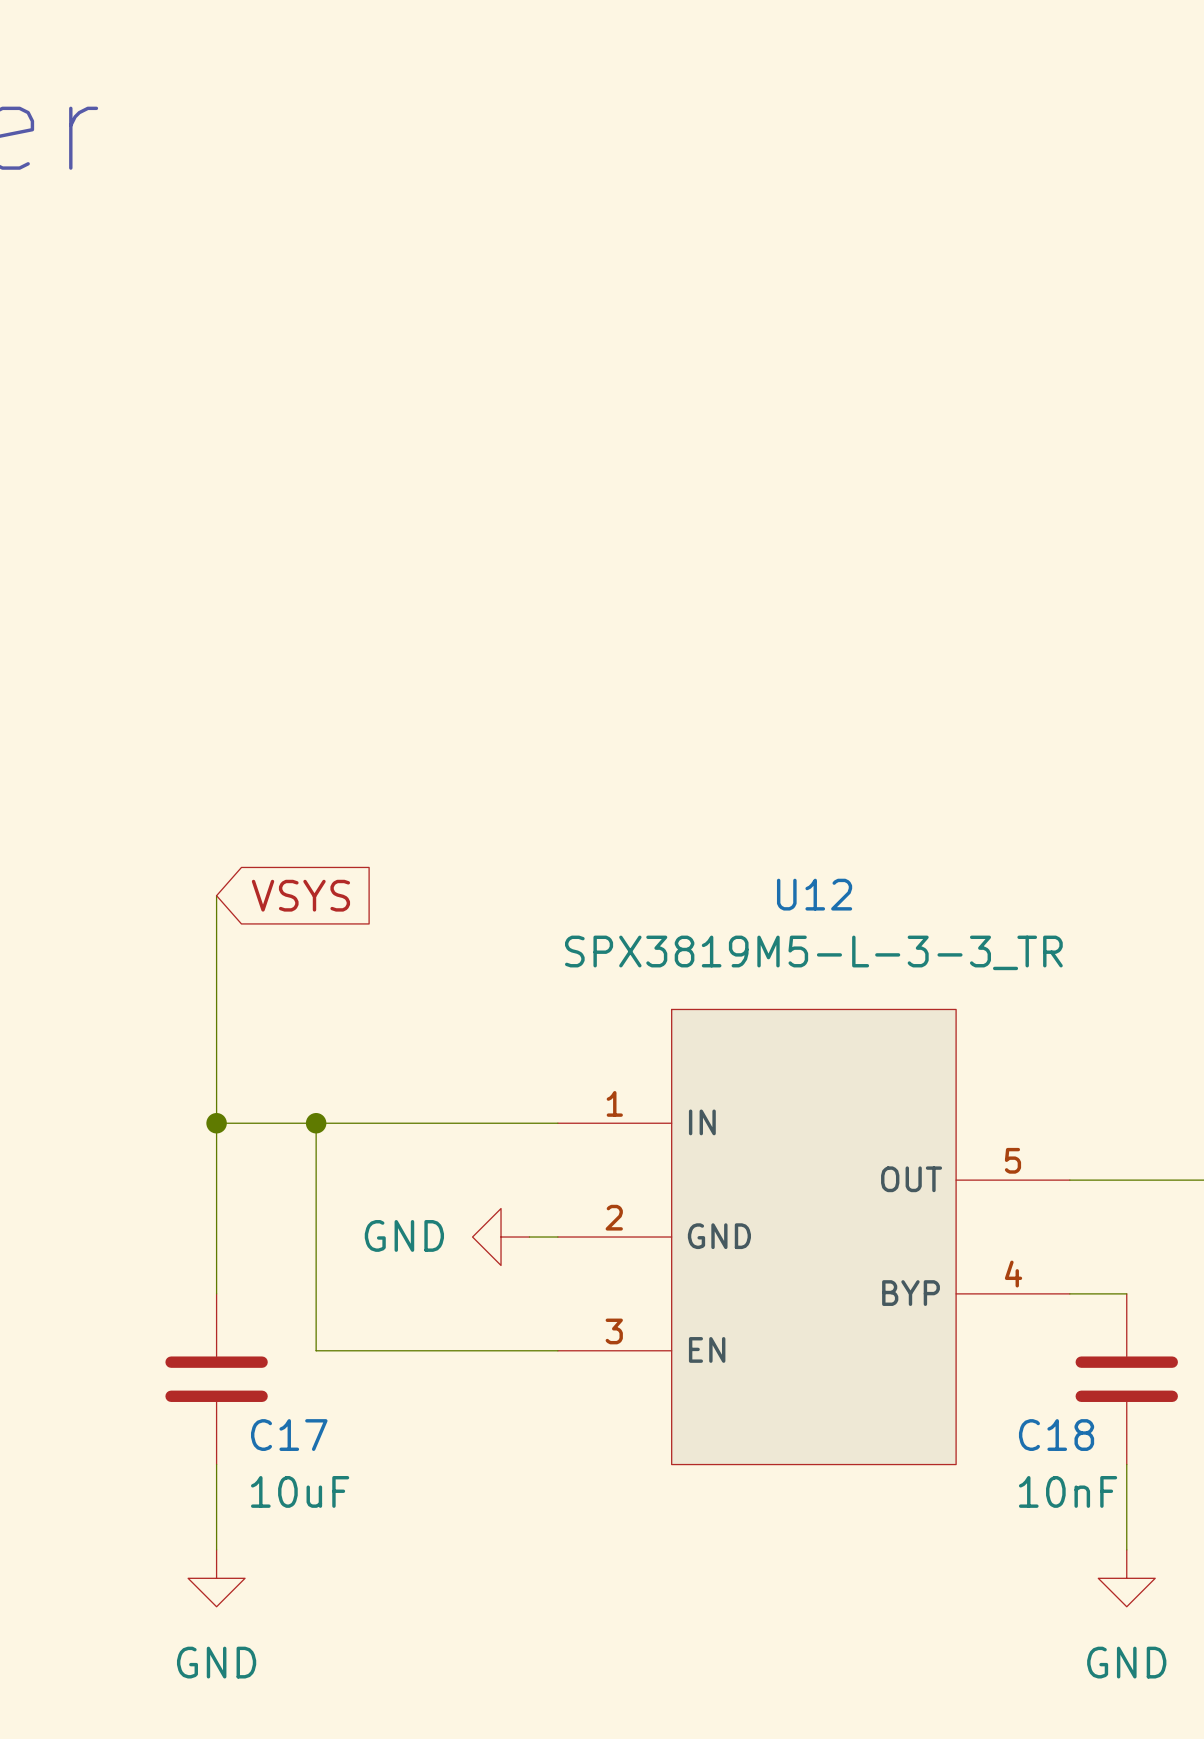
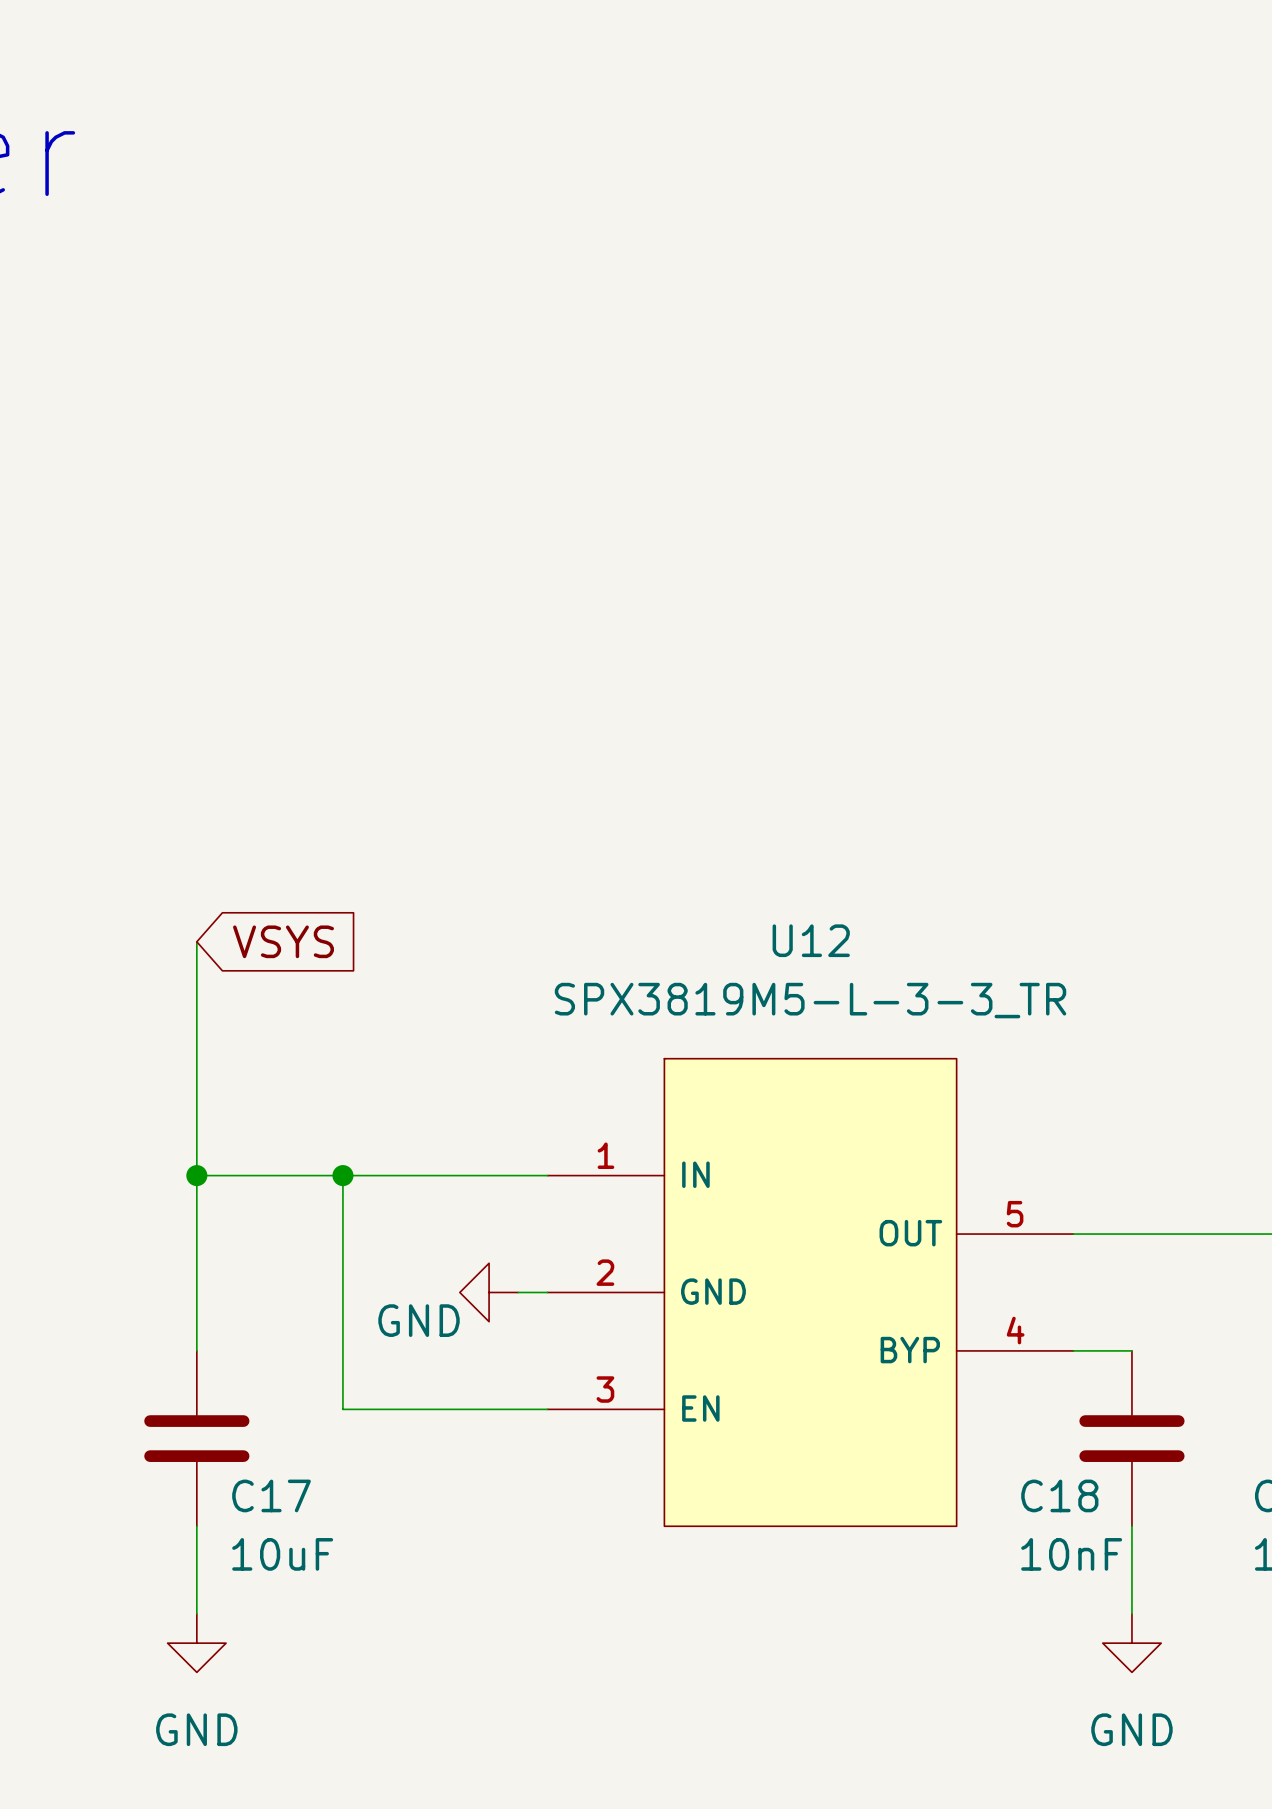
wire: (316, 1123) (316, 1350) (358, 1350) -> (342, 1175) (342, 1409)
junction position: (316, 1123) -> (342, 1175)
power symbol text position: GND (404, 1235) -> GND (419, 1320)

